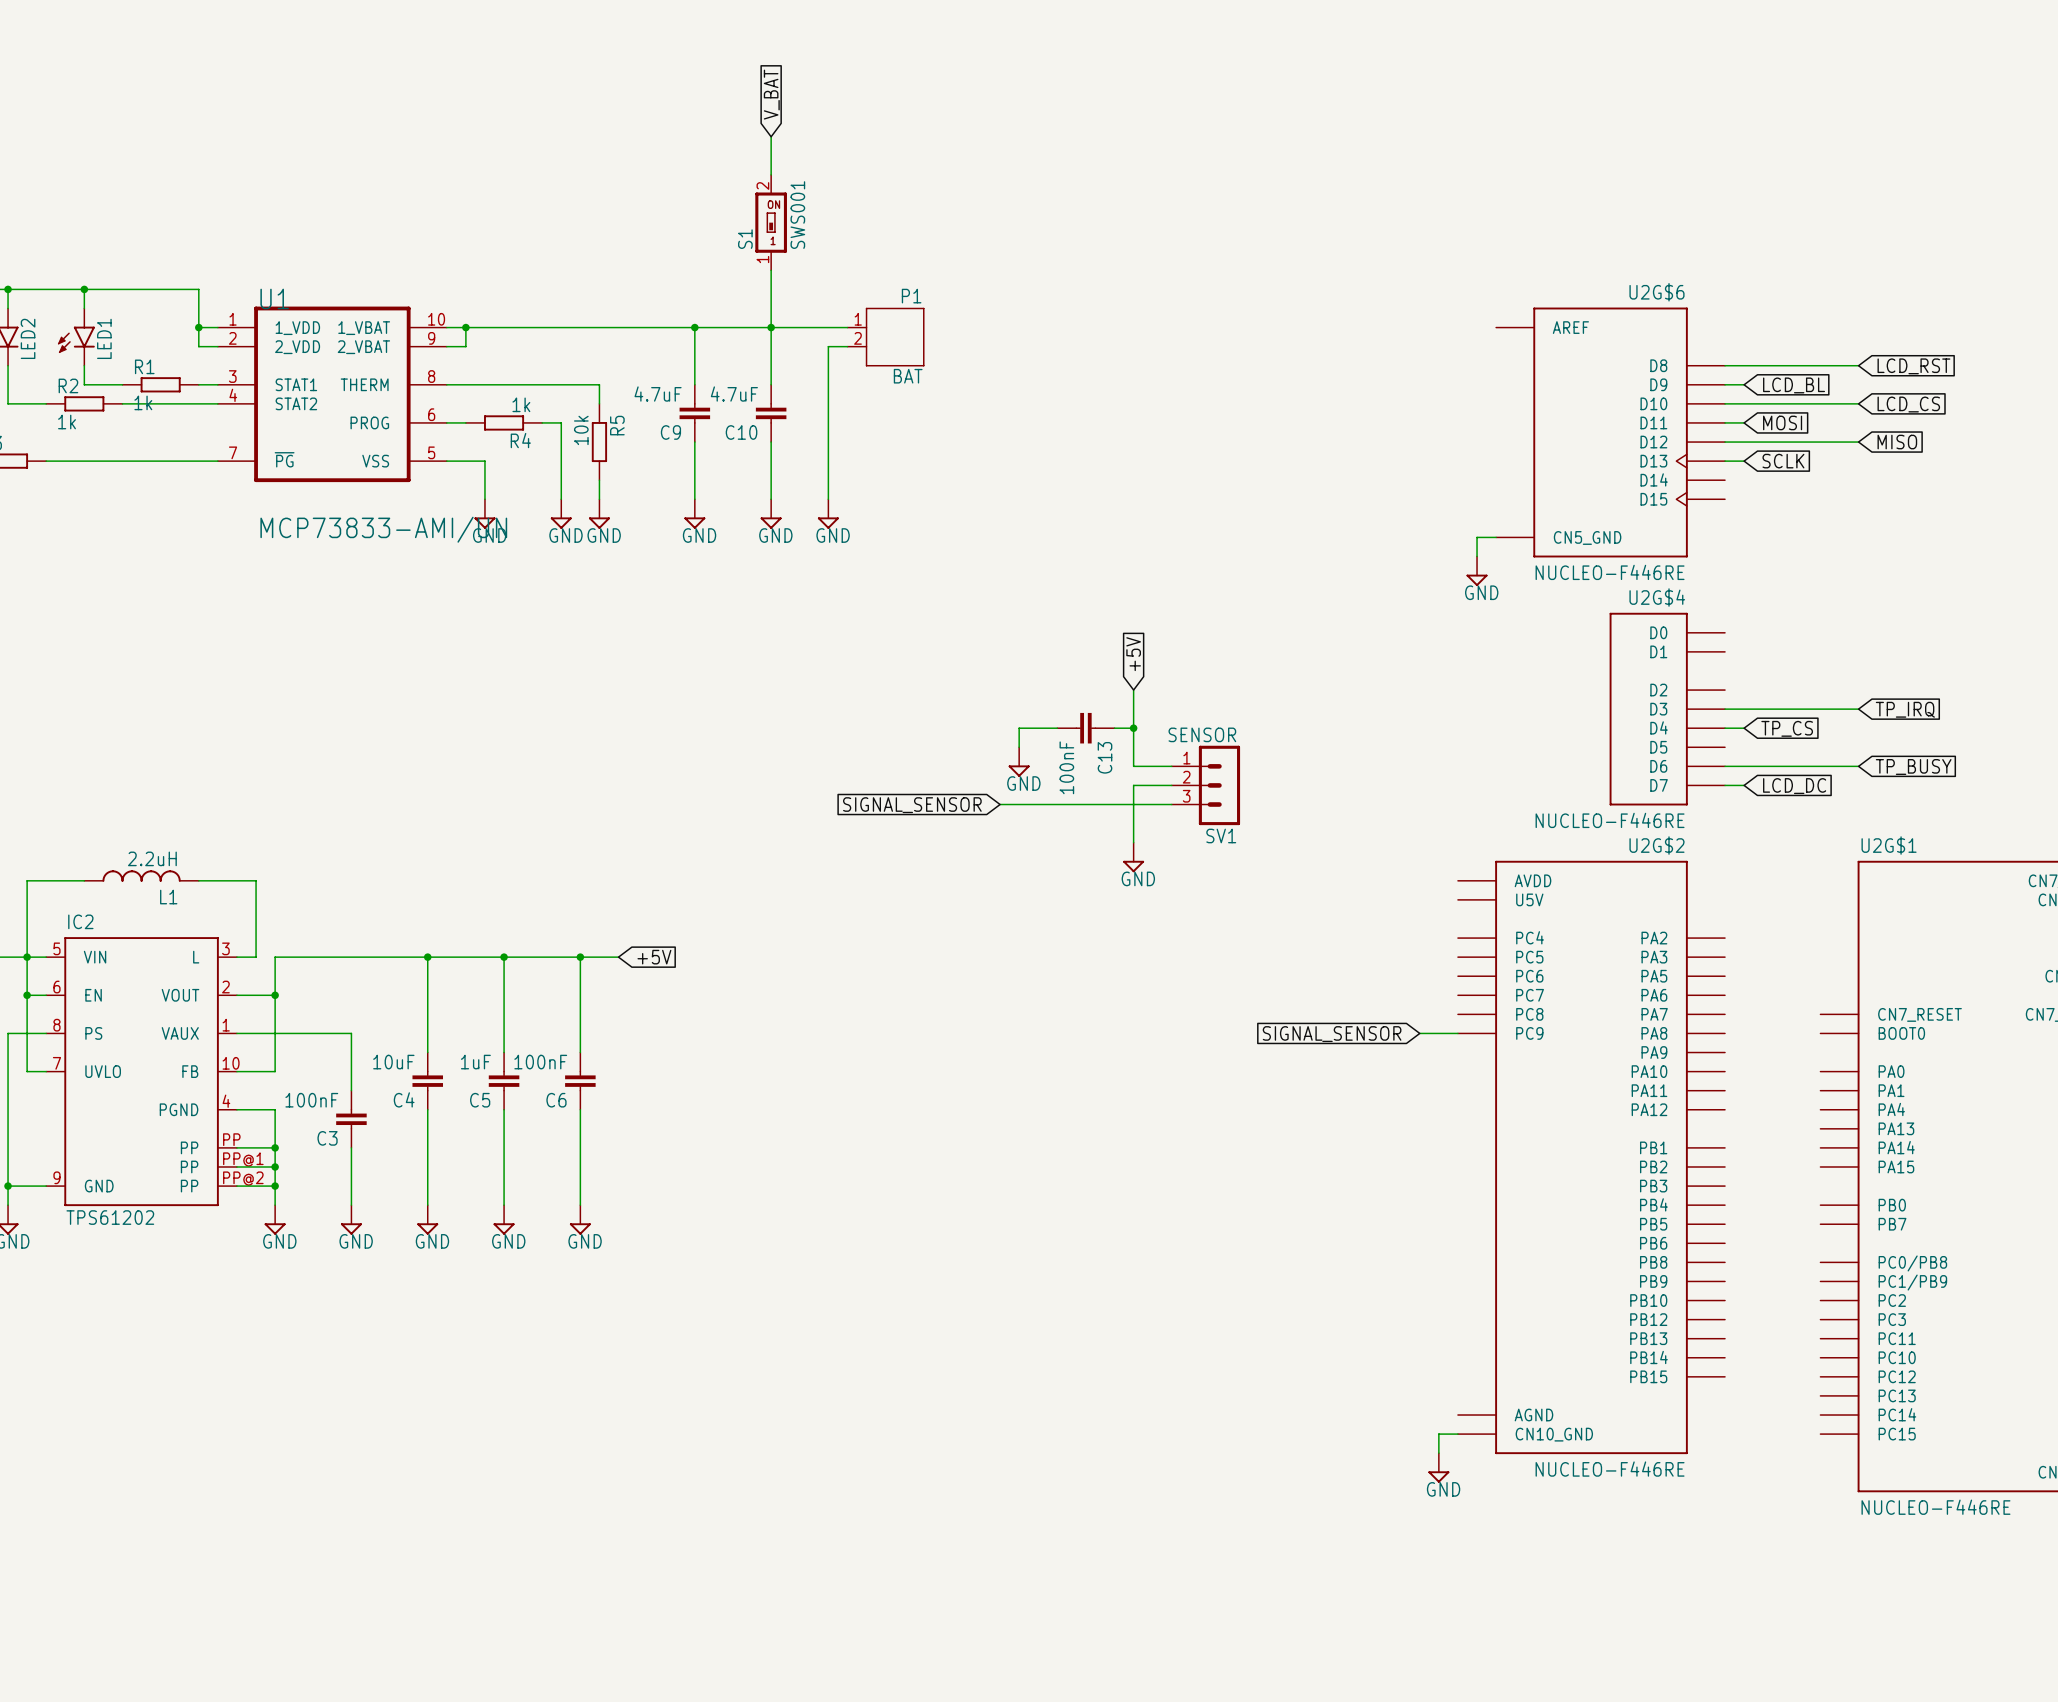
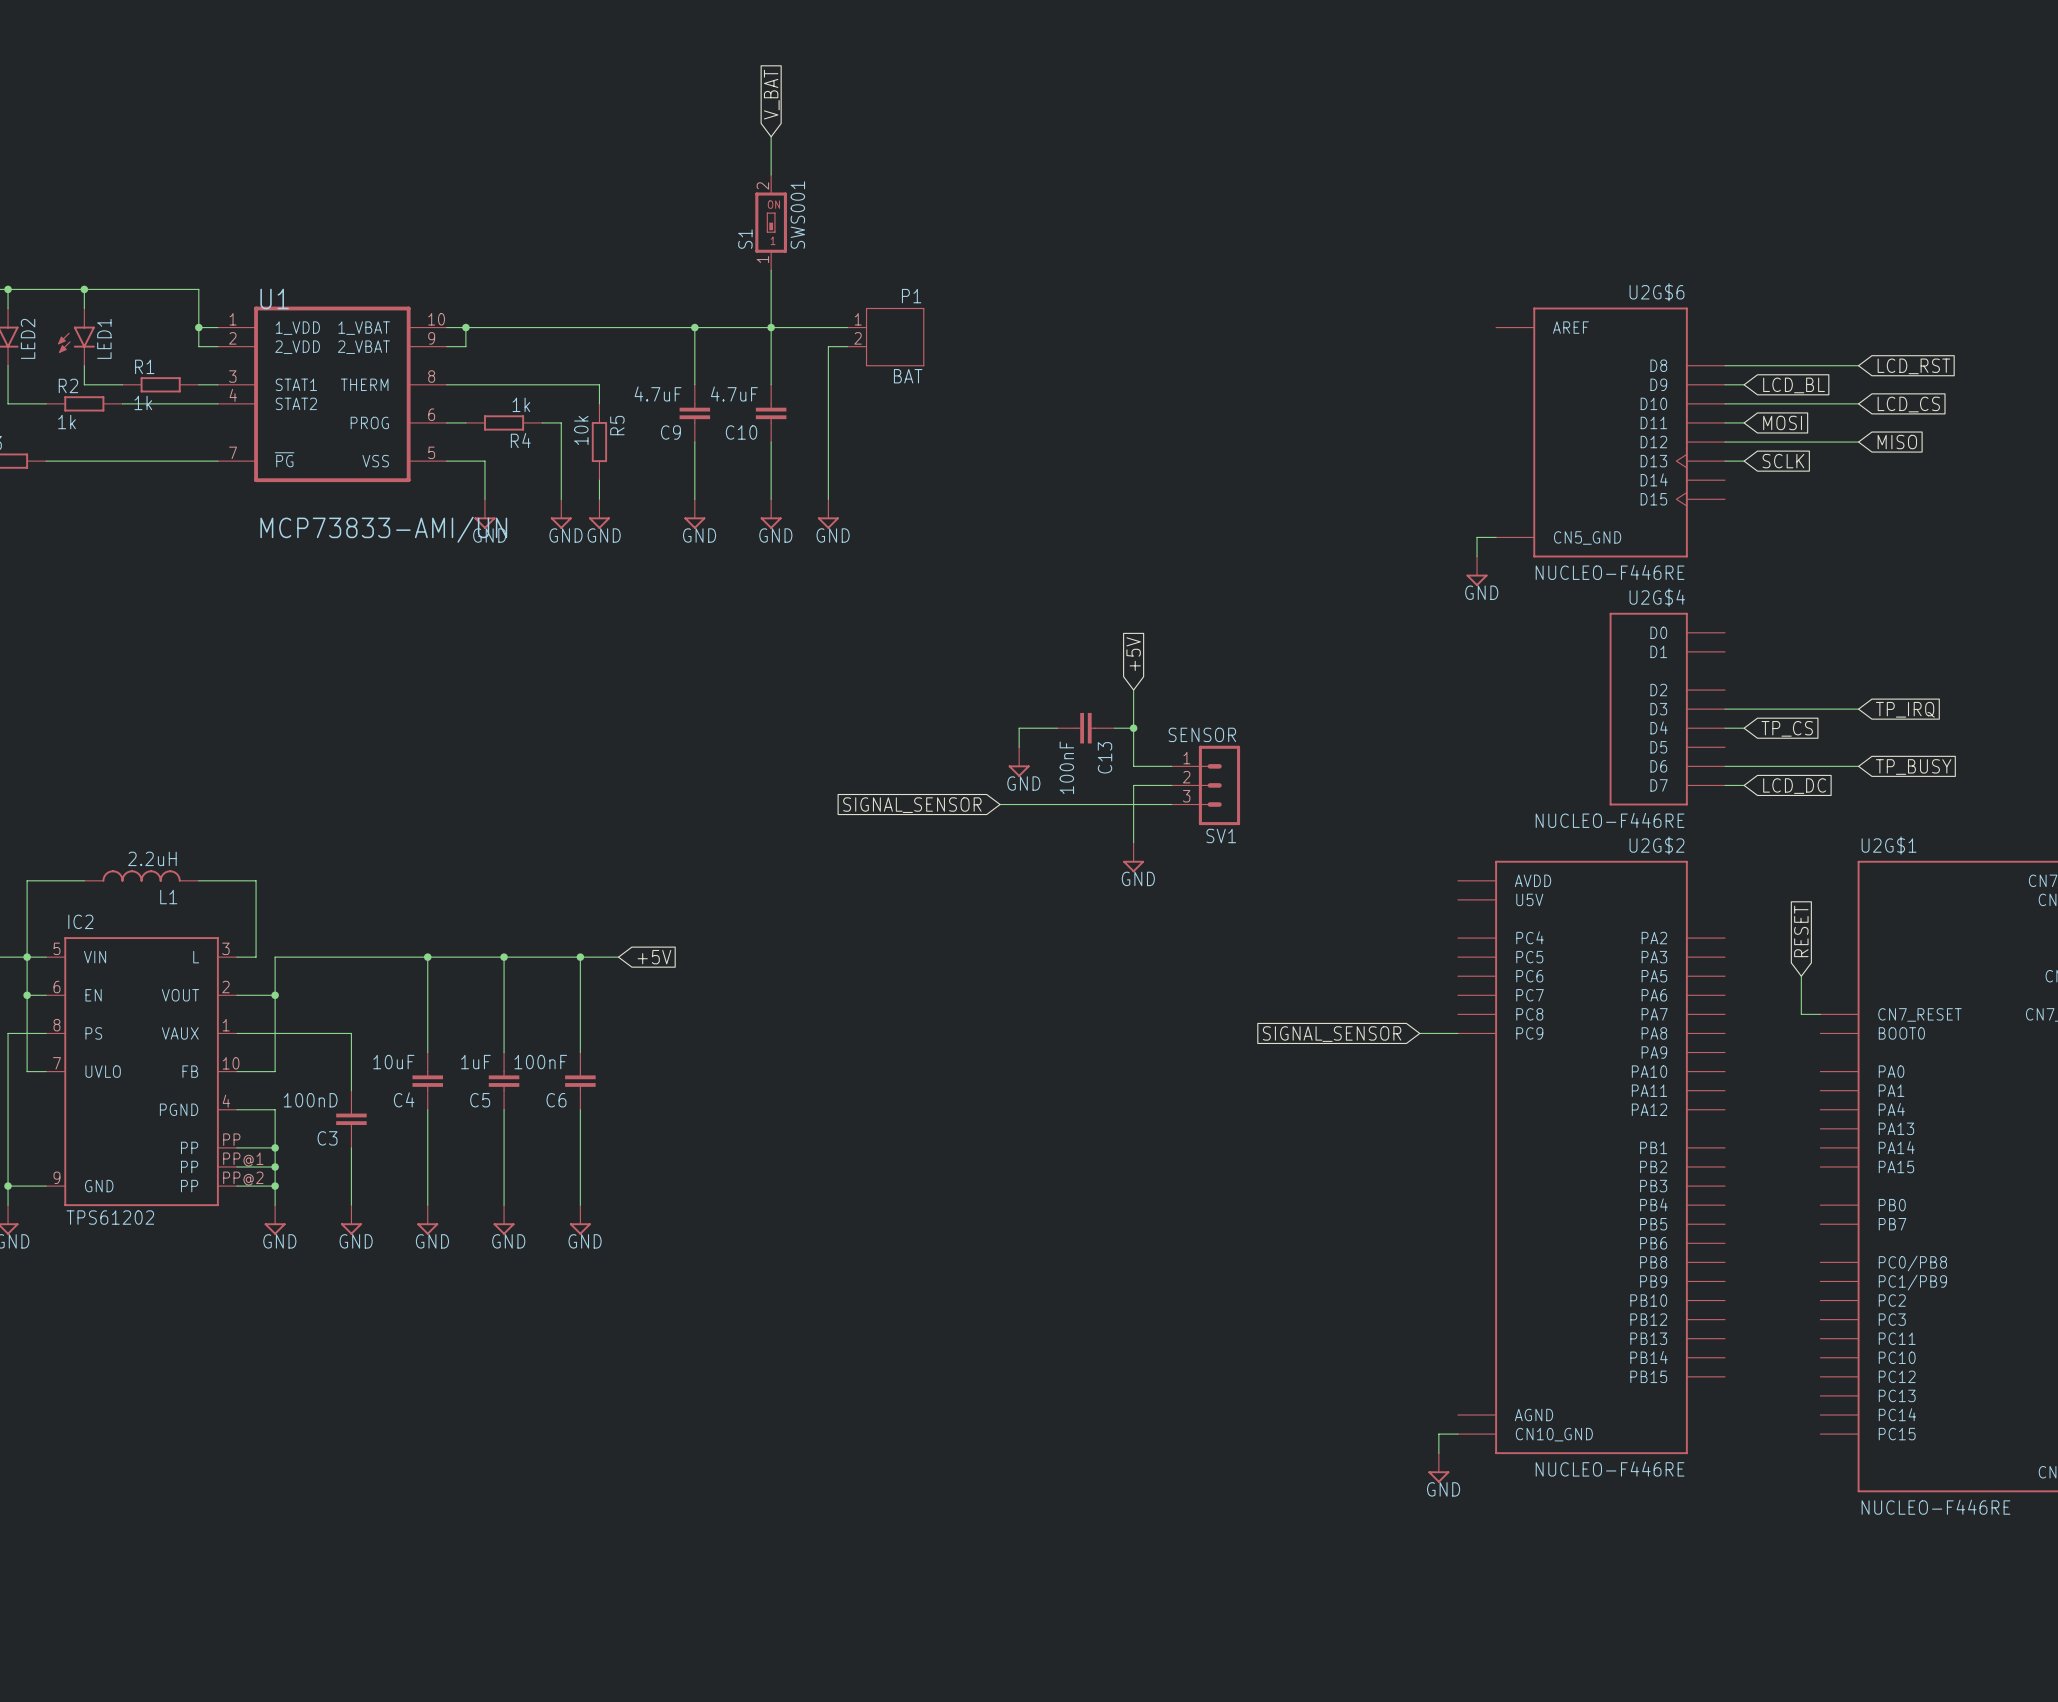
global label: none -> RESET (1801, 931)
wire: none -> (1801, 976) (1801, 1014) (1820, 1014)
C3 value: 100nF (311, 1100) -> 100nD (310, 1100)

